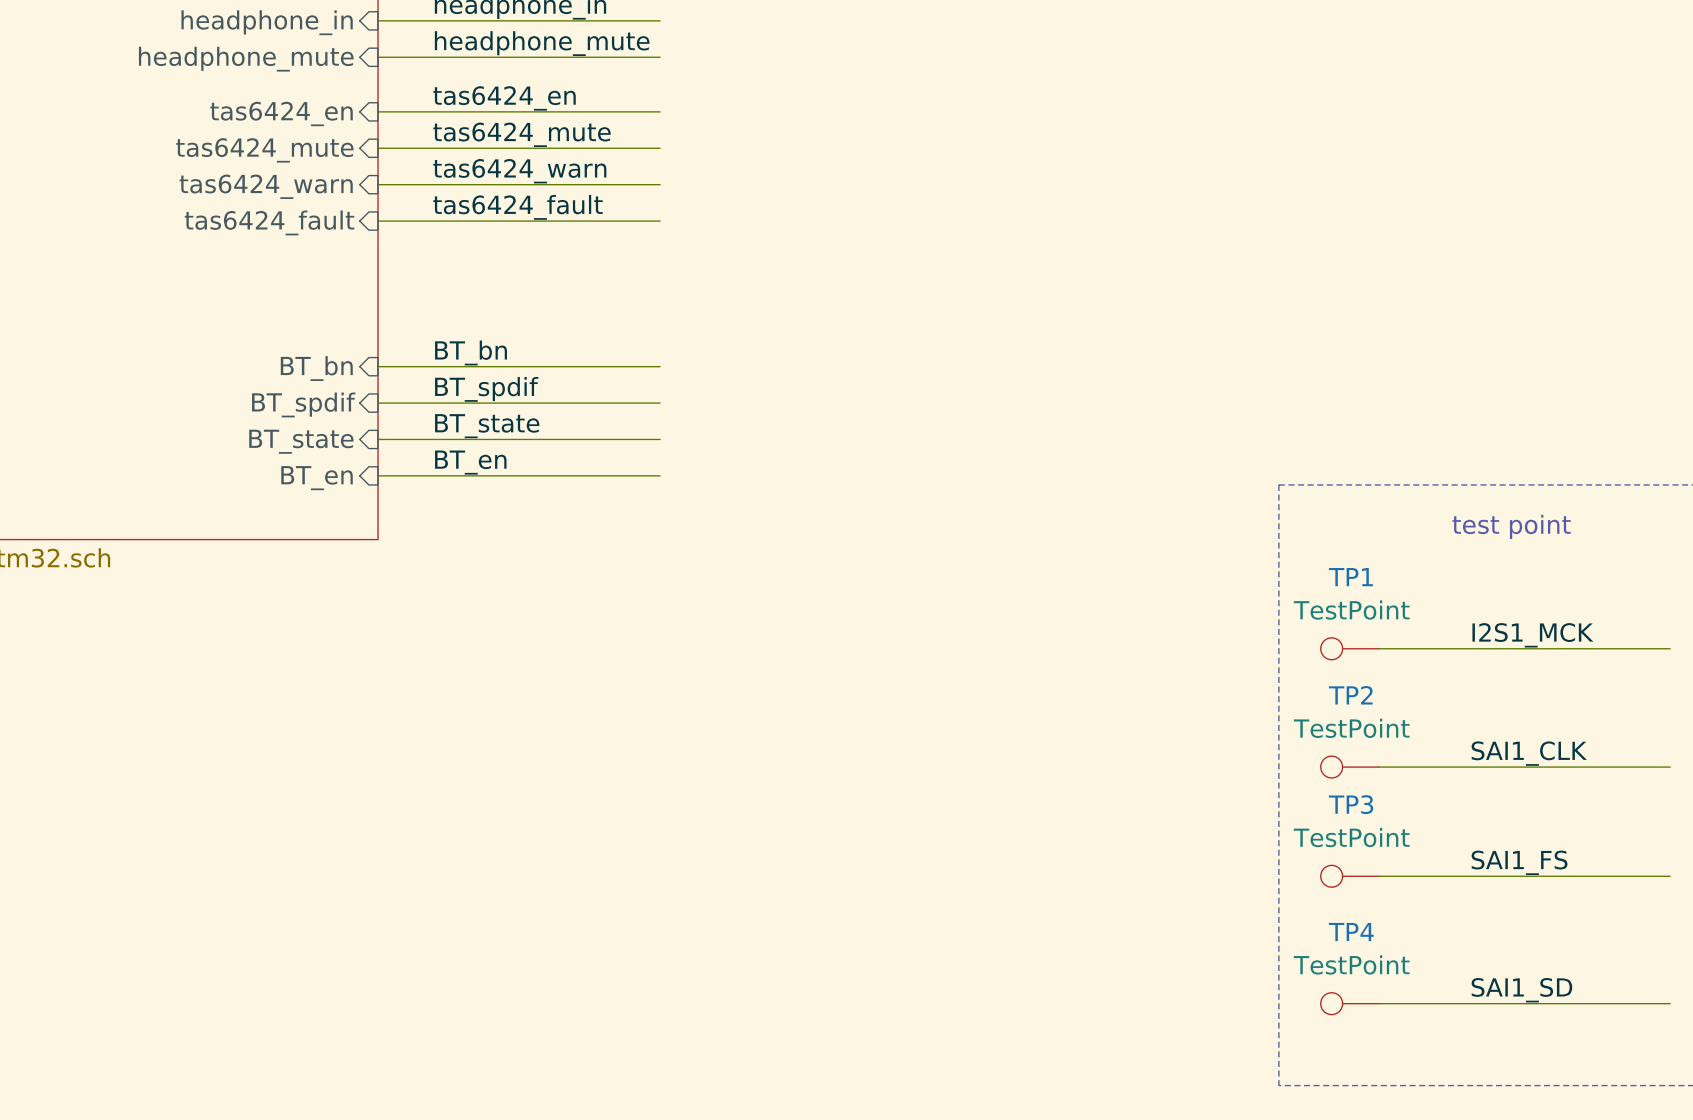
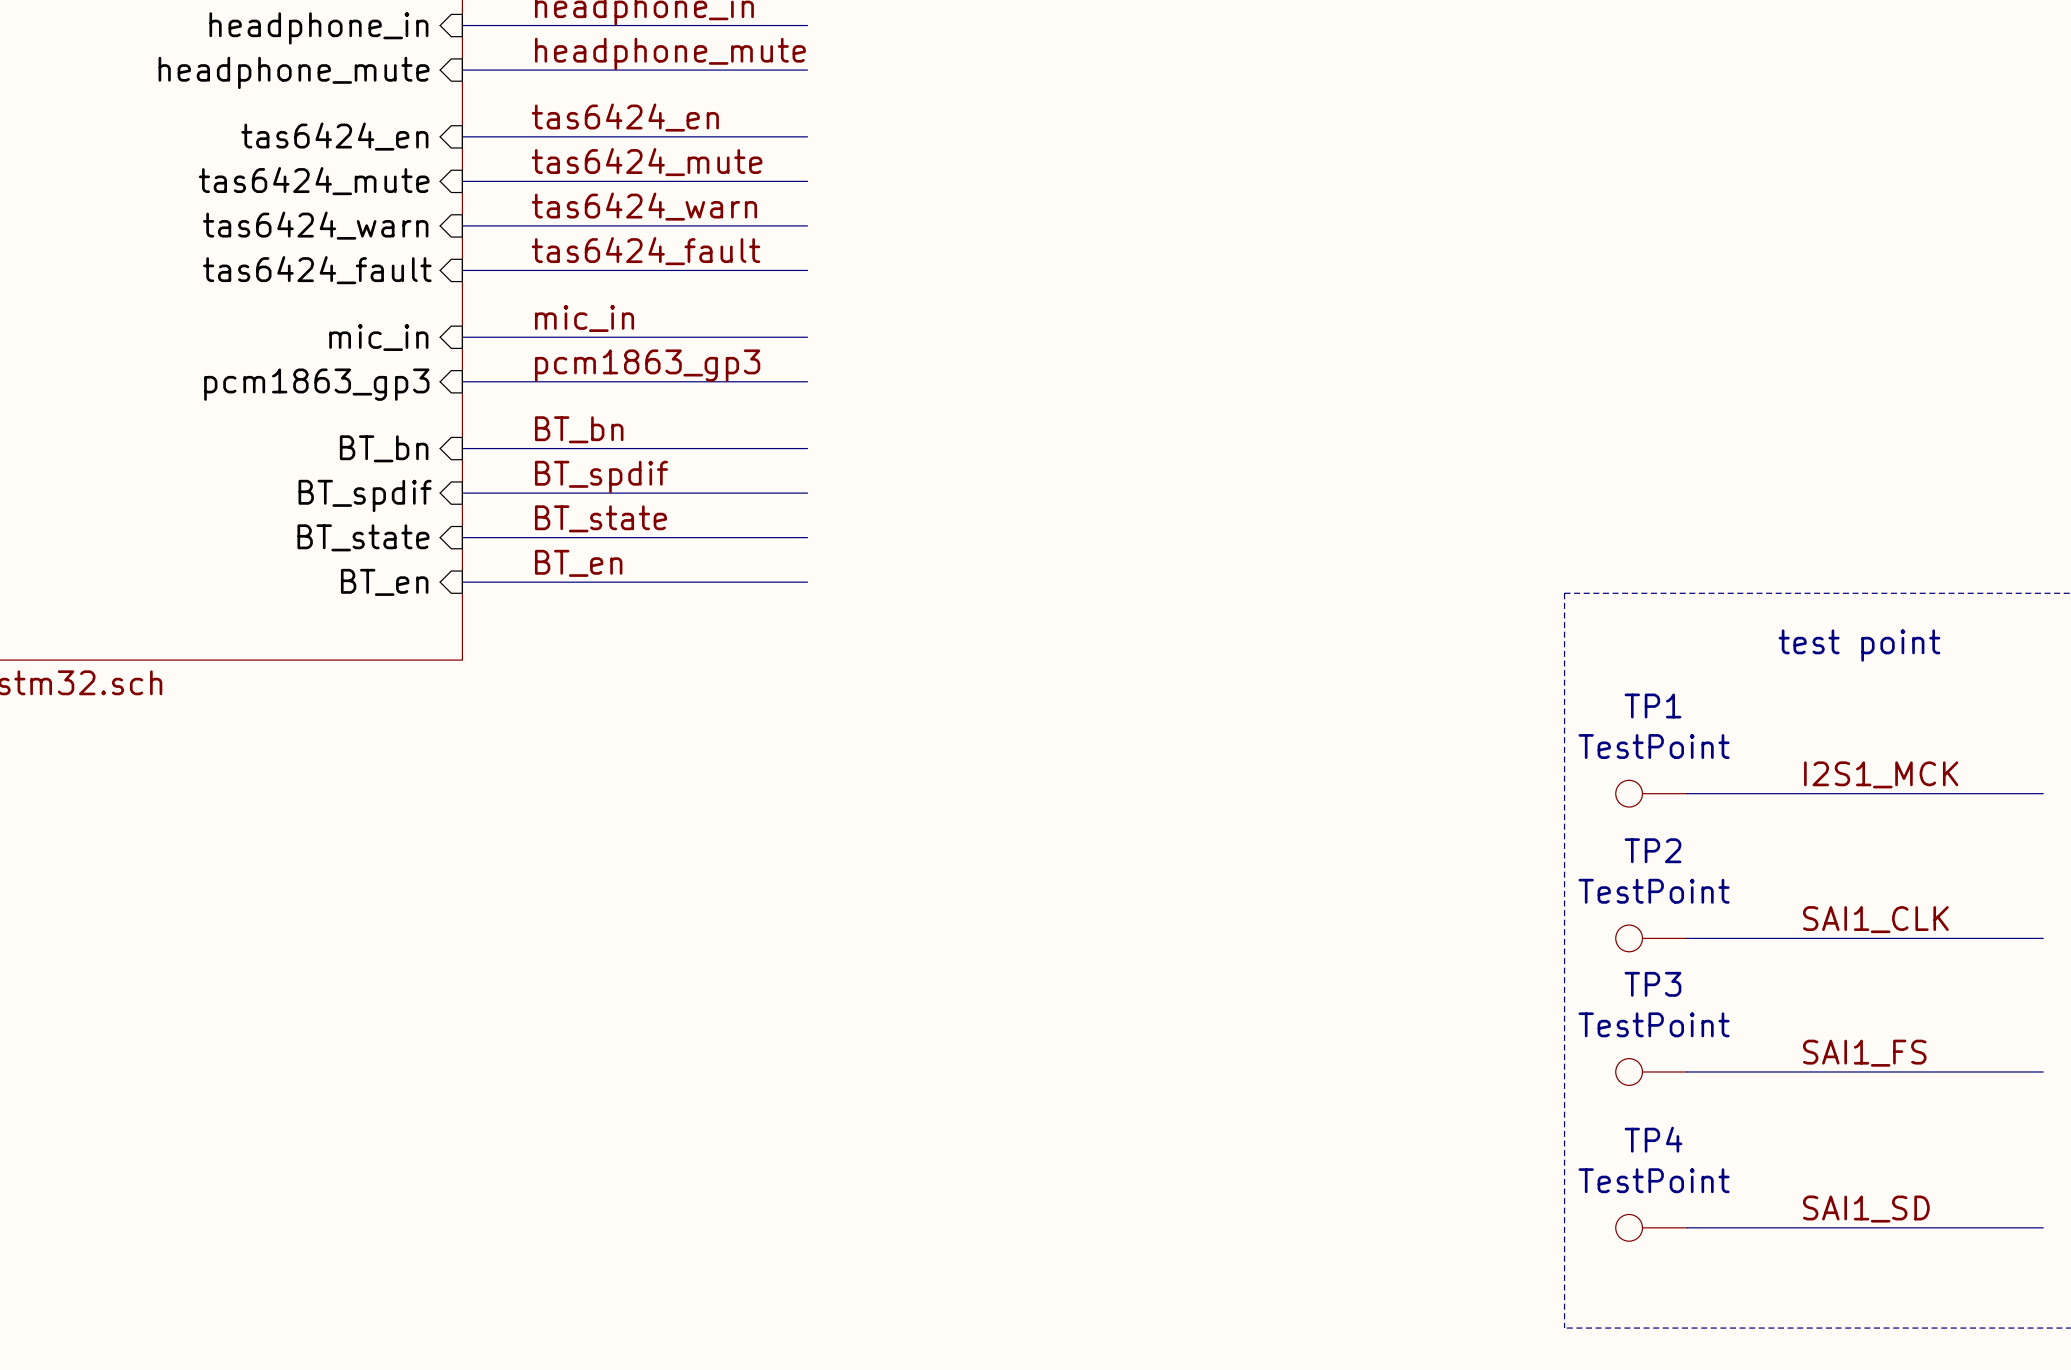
label: none -> mic_in (584, 318)
wire: none -> (462, 337) (807, 337)
sheet pin: none -> mic_in (378, 337)
label: none -> pcm1863_gp3 (647, 365)
wire: none -> (462, 381) (807, 381)
sheet pin: none -> pcm1863_gp3 (316, 384)

